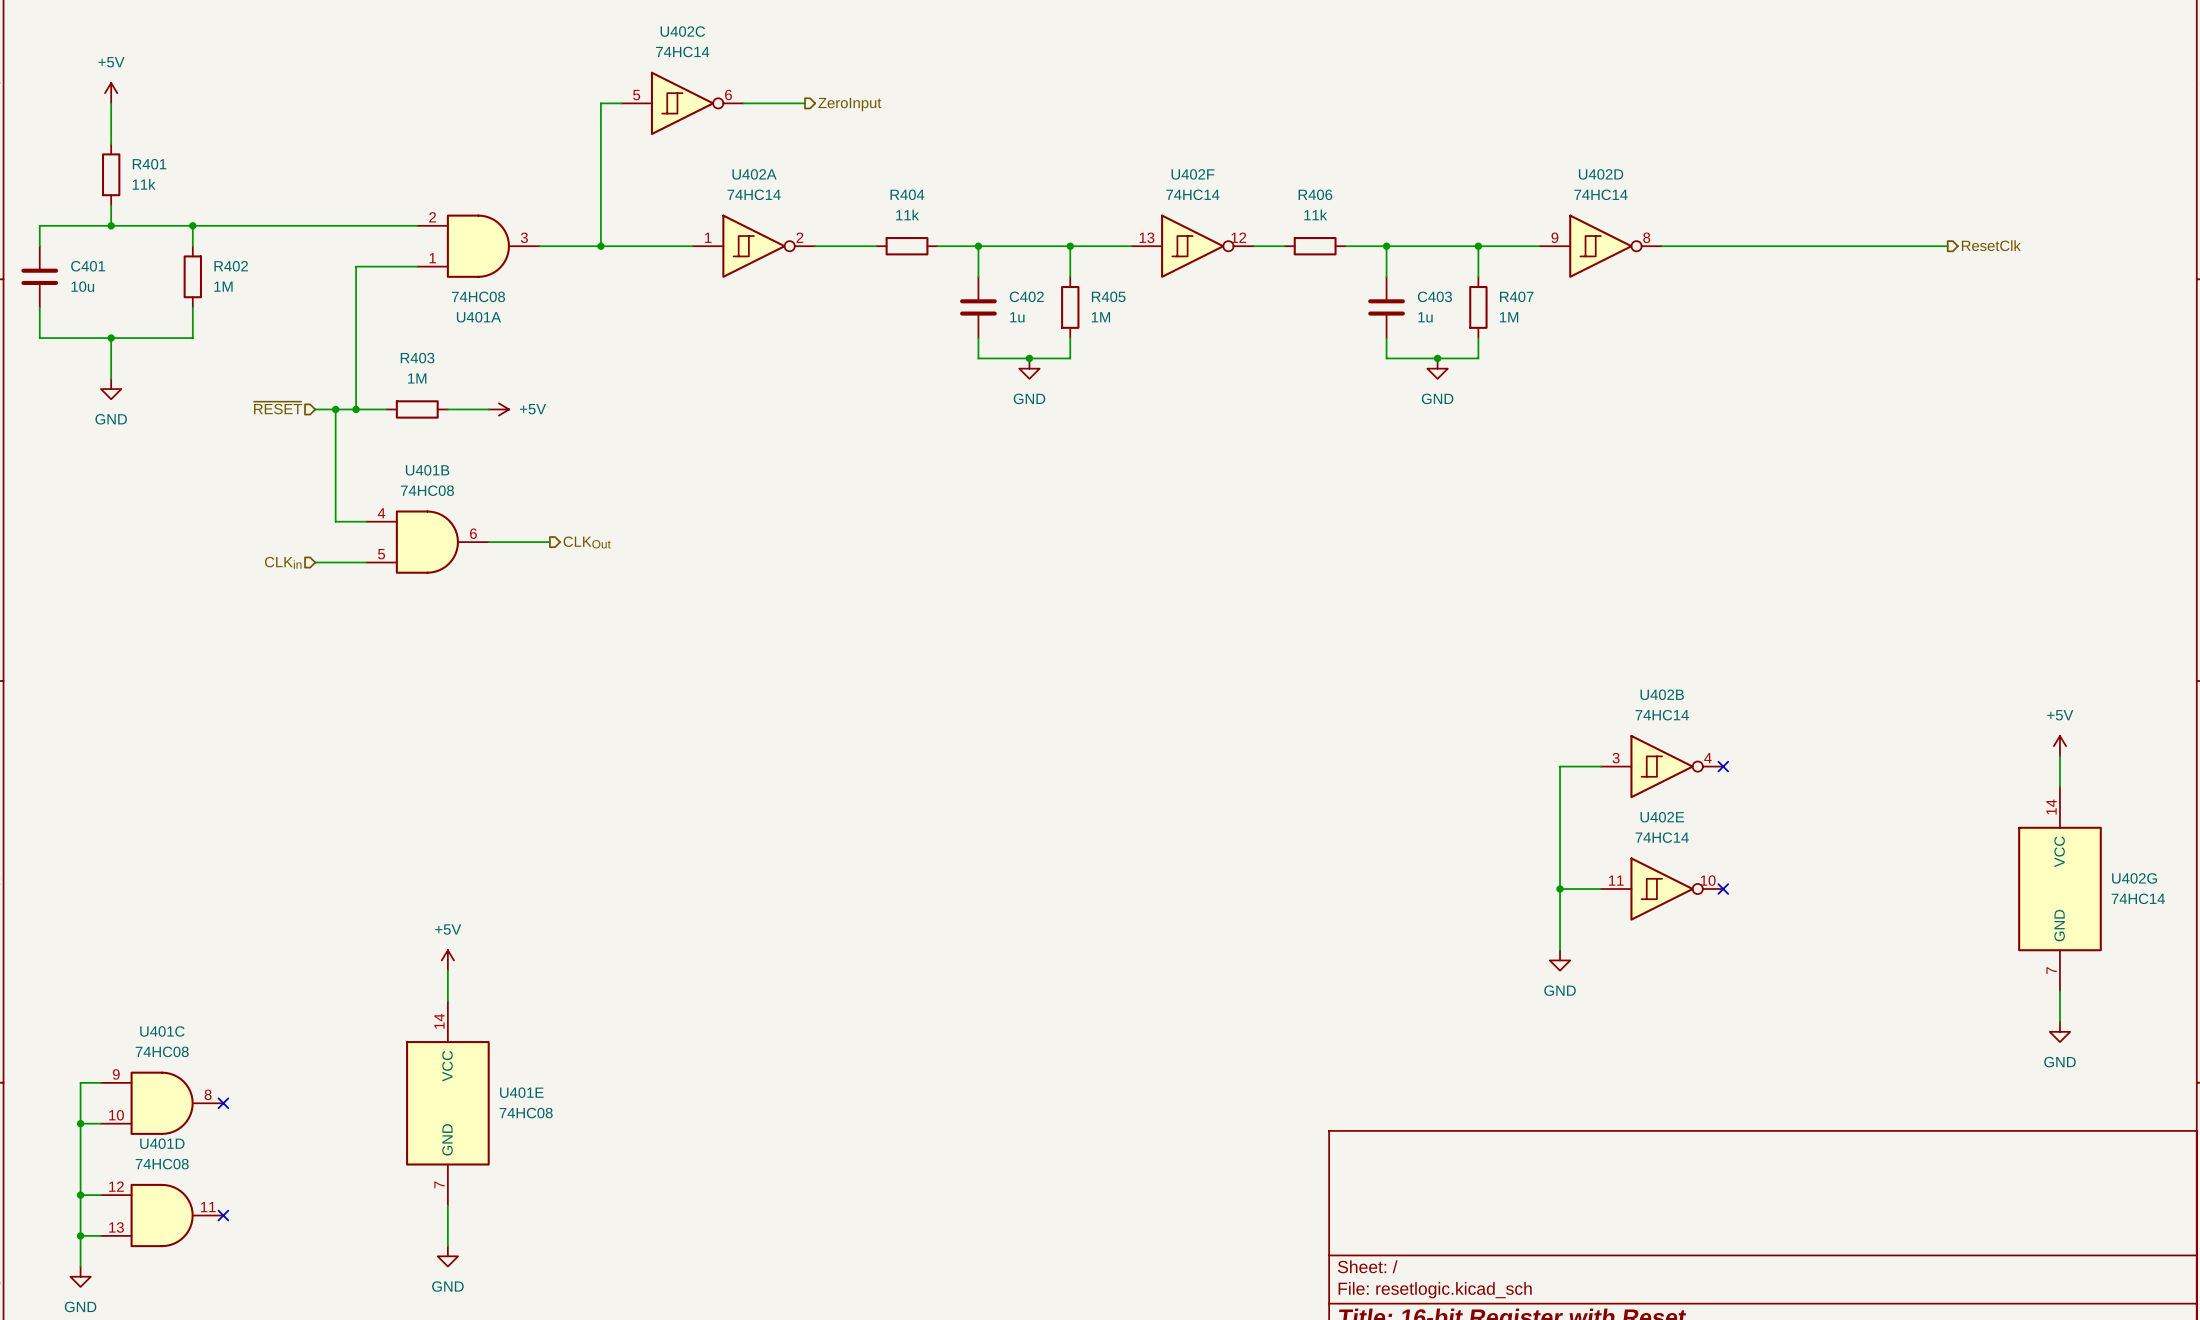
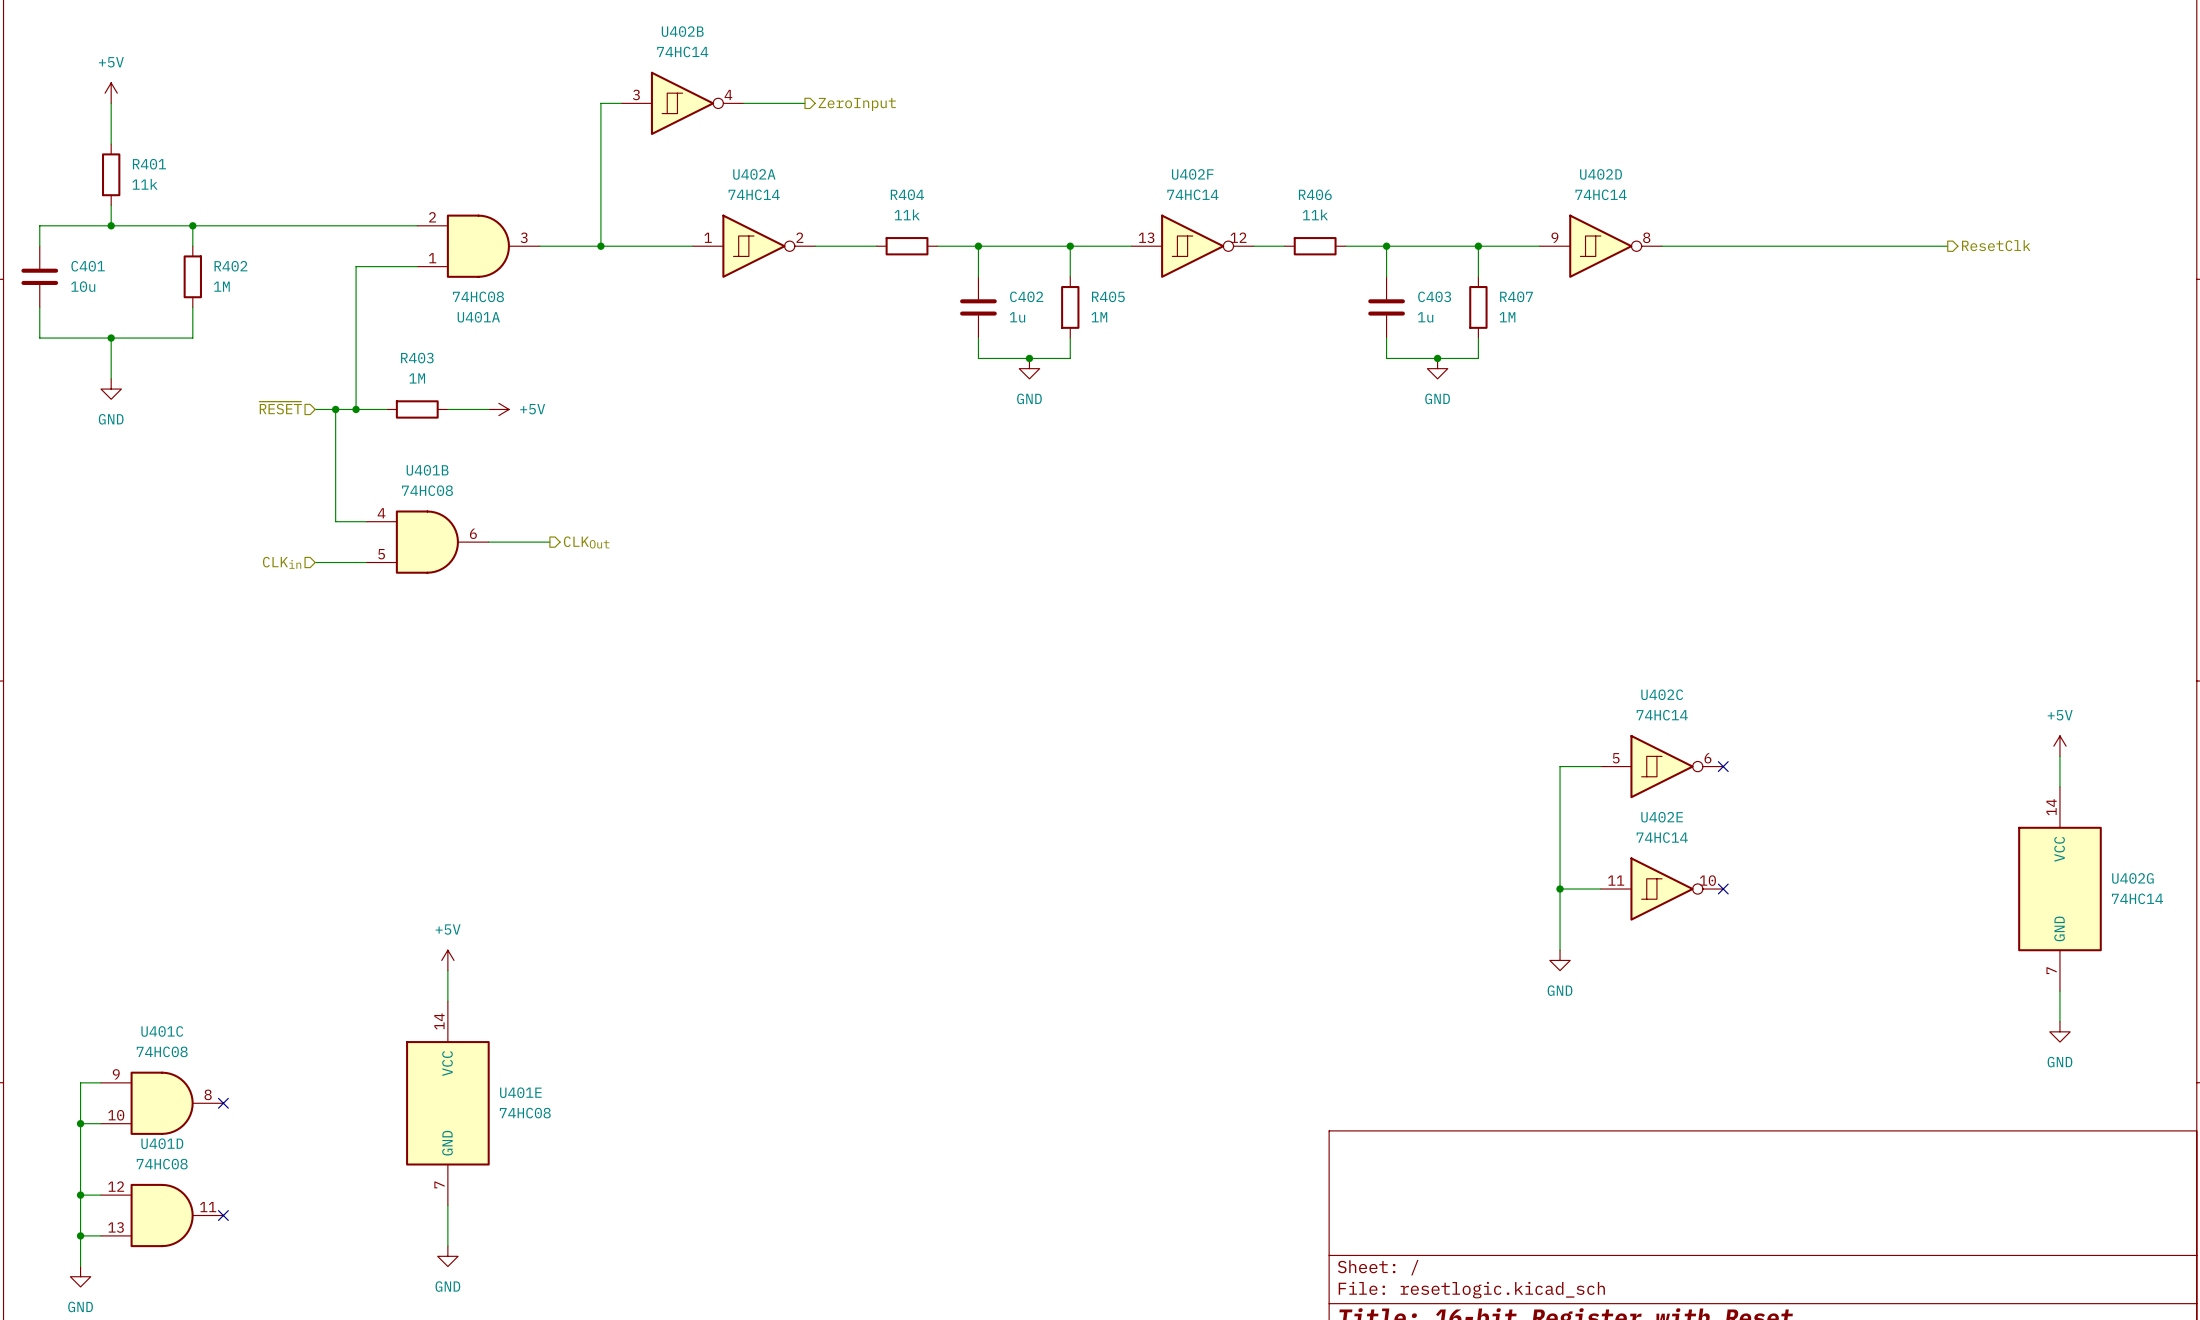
U402C position: (682, 103) -> (1662, 766)
U402B position: (1662, 766) -> (682, 103)

